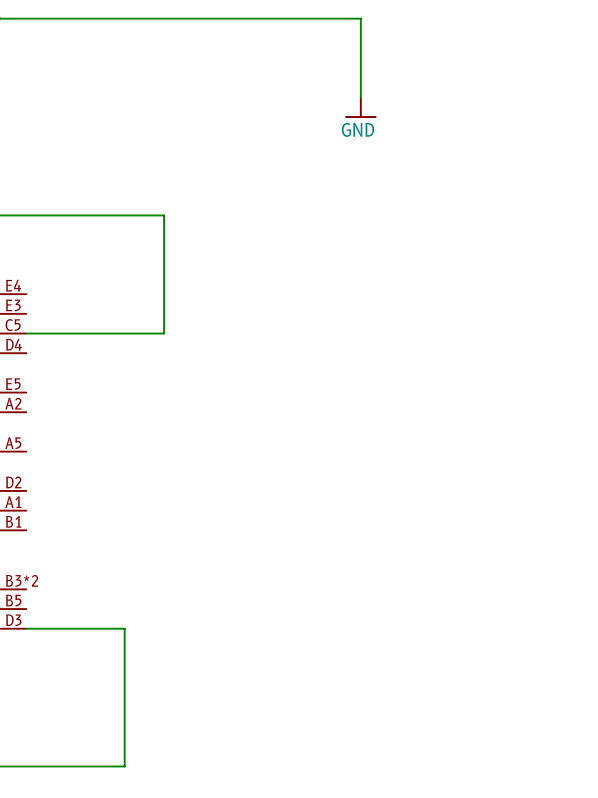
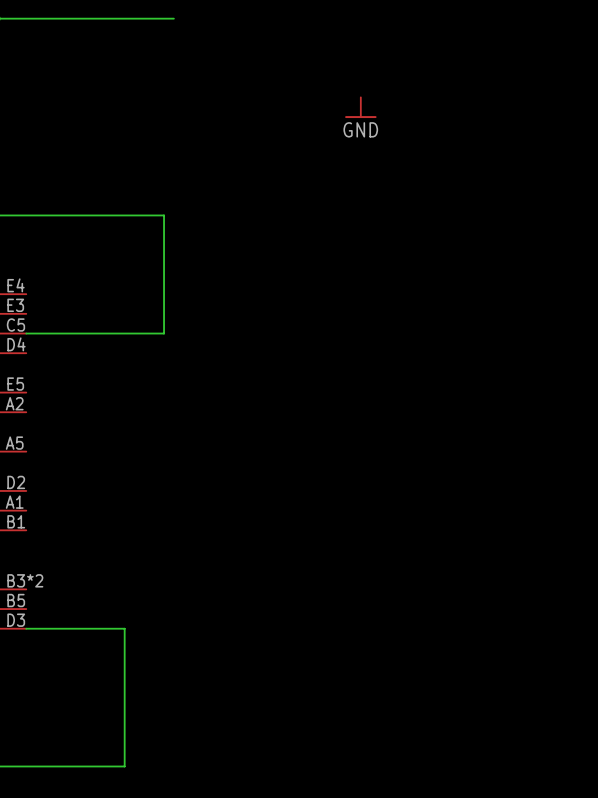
wire: (173, 18) (360, 18) (360, 97) -> none

